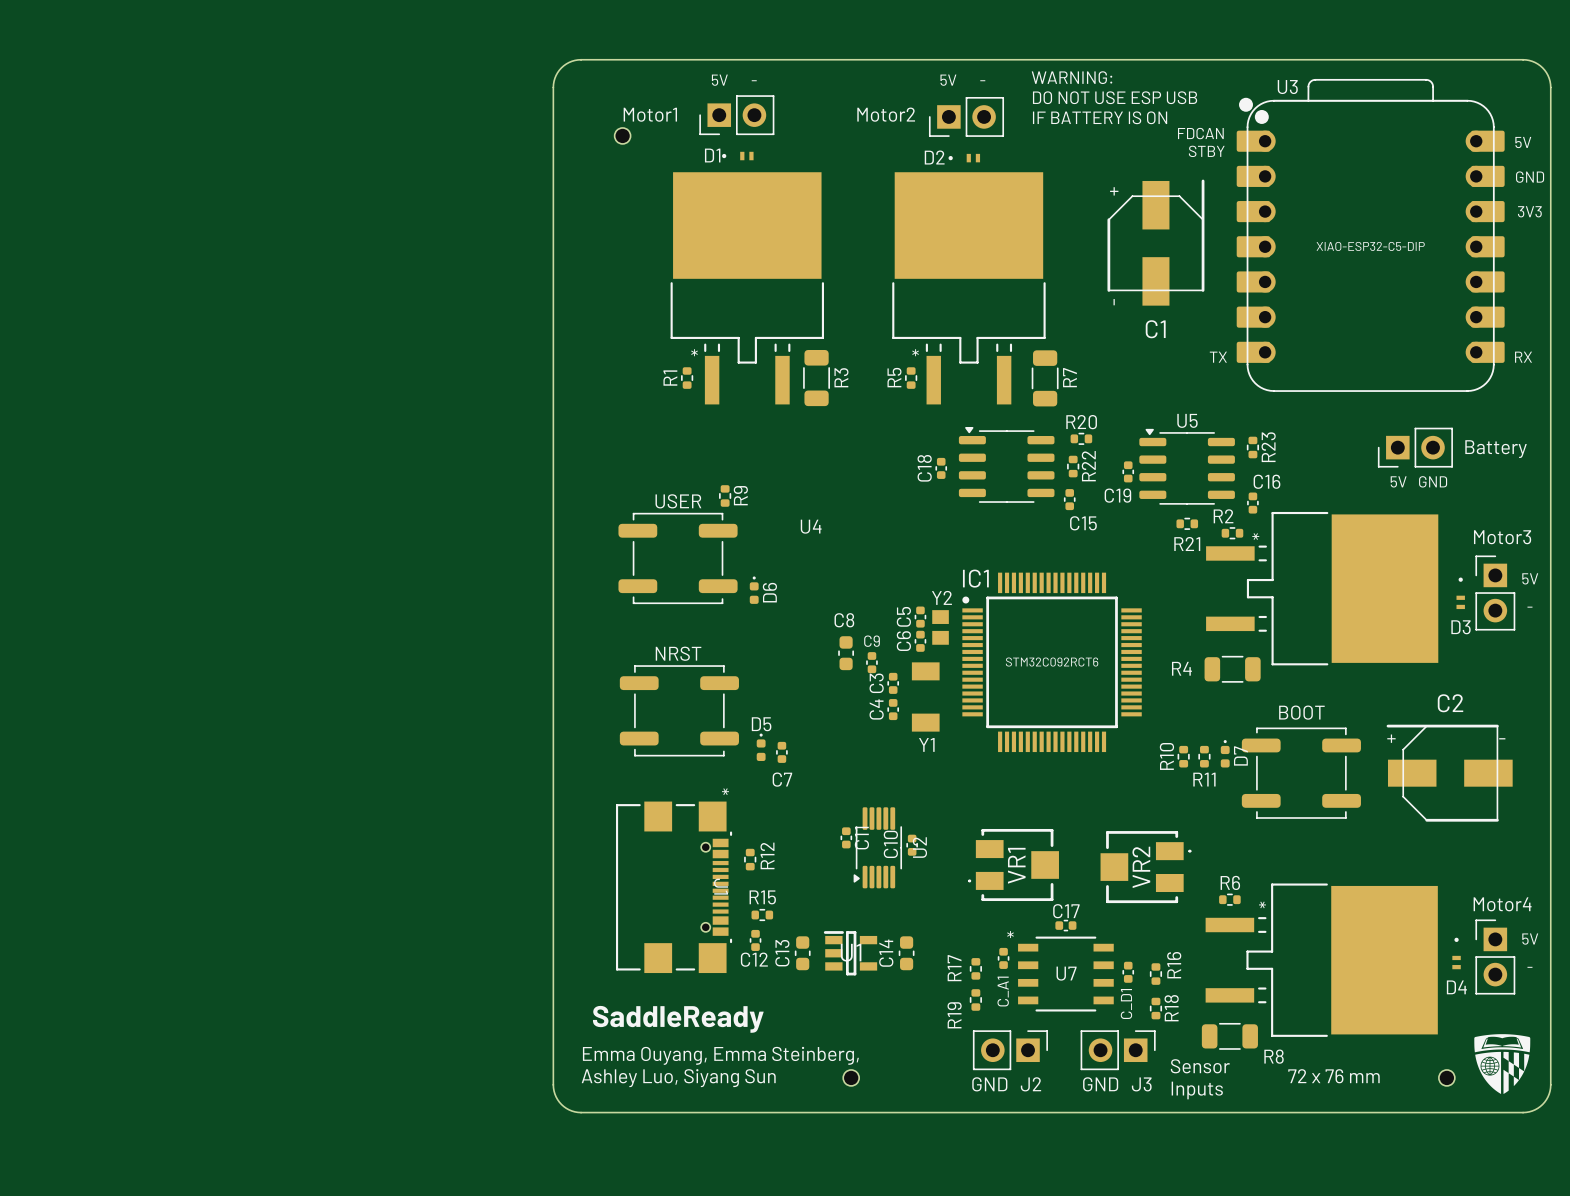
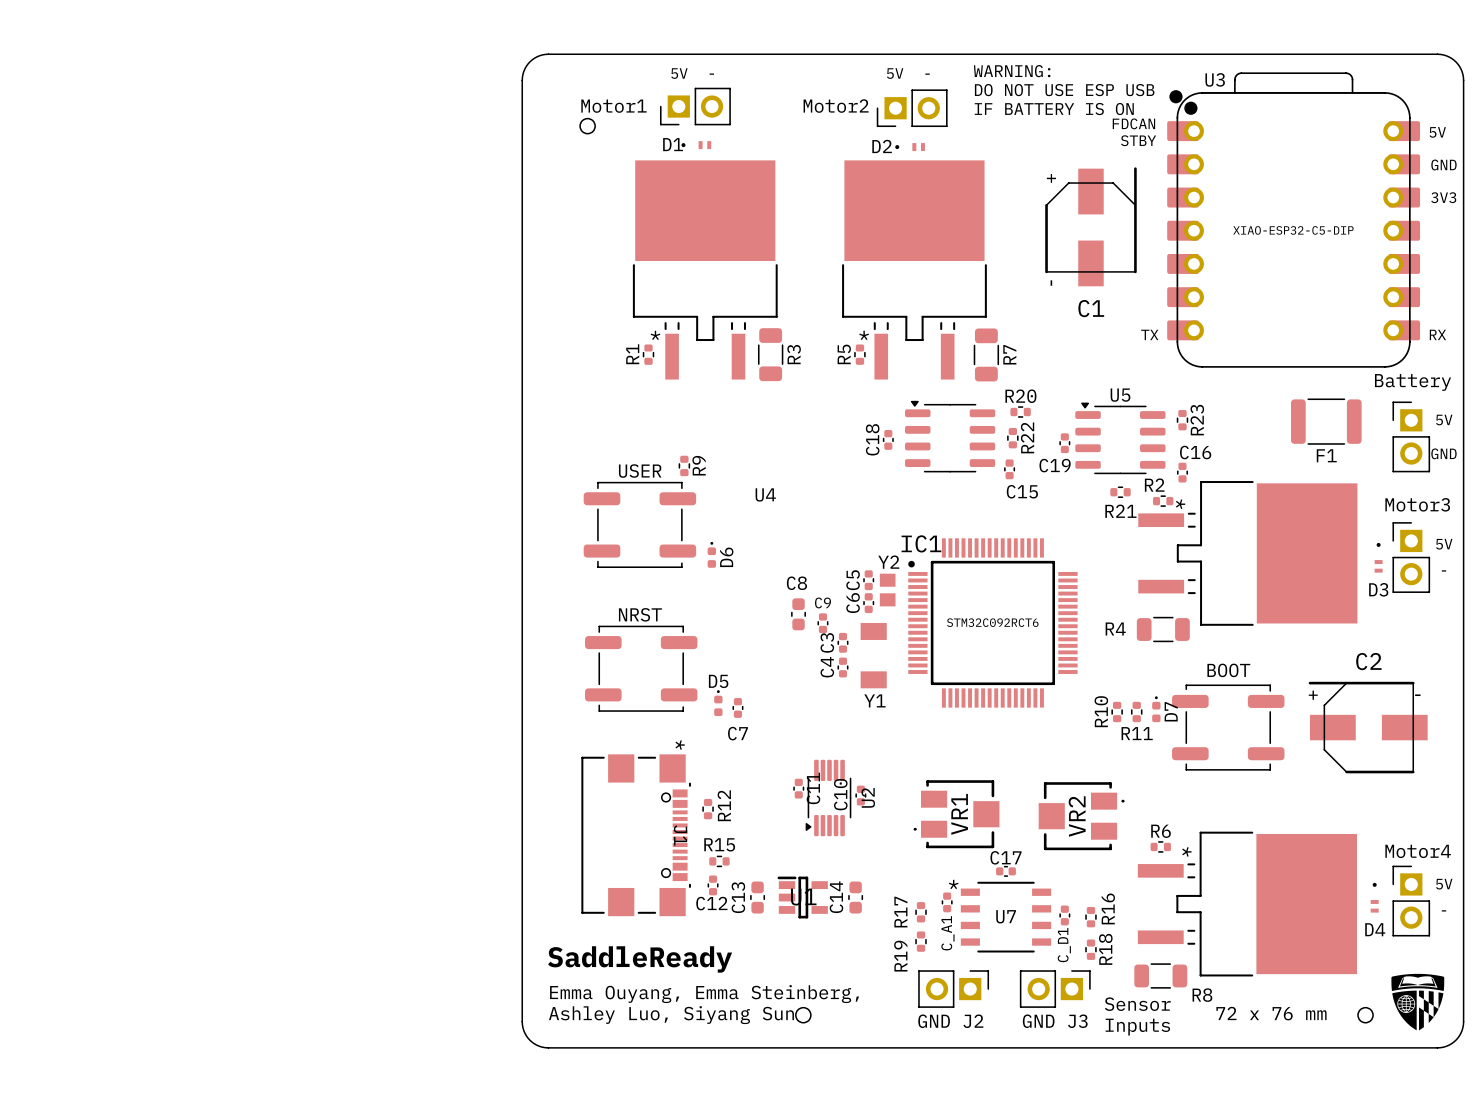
part rotation: 0° (1415, 447) -> 90° clockwise (1411, 436)
part position: (1415, 447) -> (1411, 436)
F1: none -> (1326, 421)
text position: Battery (1496, 449) -> Battery (1412, 382)
text position: 5V (1398, 481) -> 5V (1444, 420)
text position: GND (1433, 481) -> GND (1443, 453)

